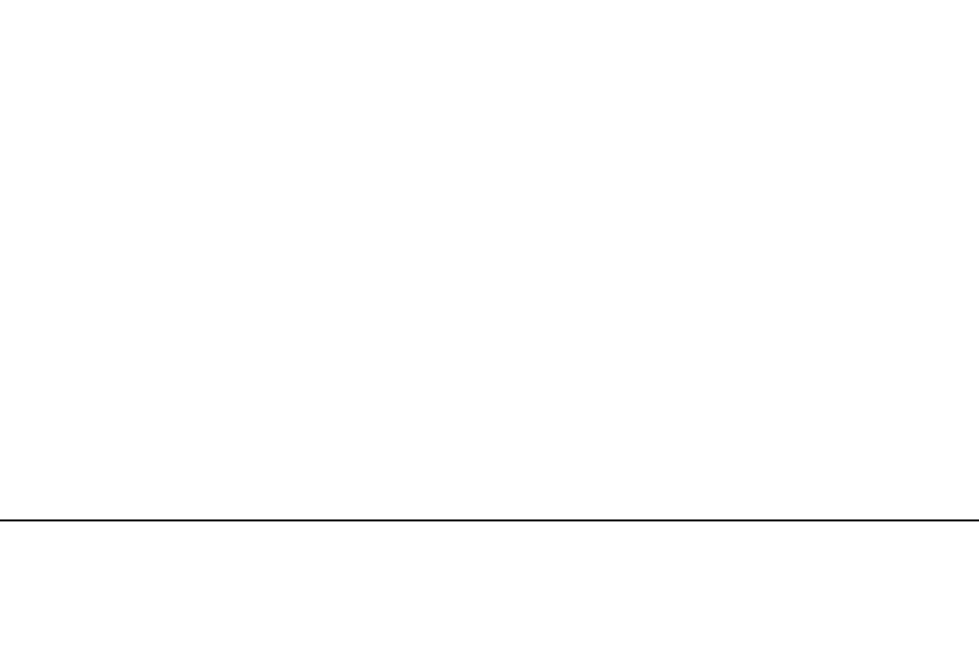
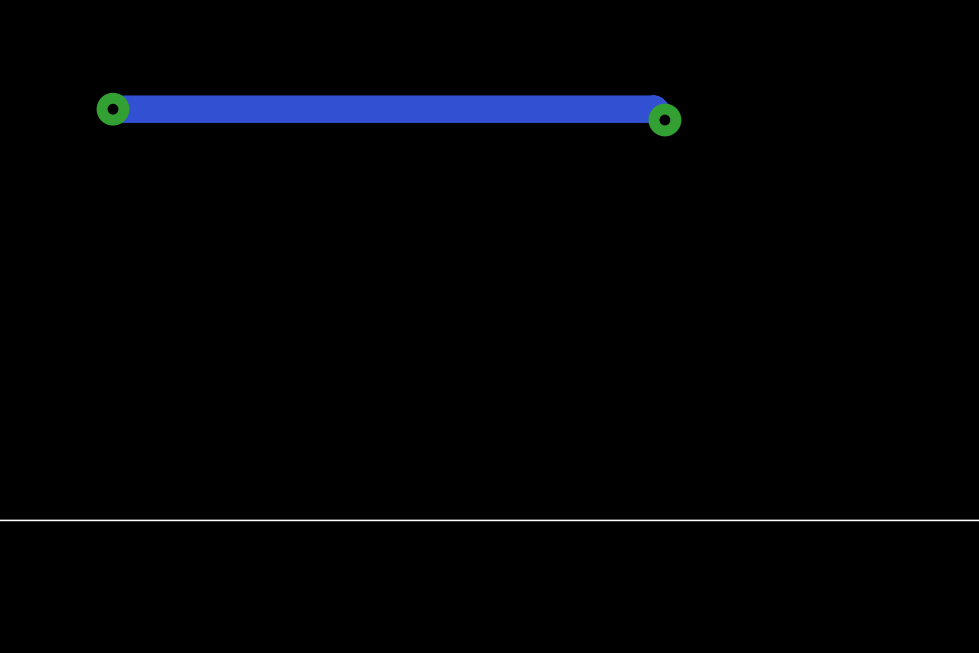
track: none -> (112, 109) (654, 109) (664, 120)
via: none -> (112, 109)
via: none -> (664, 120)

